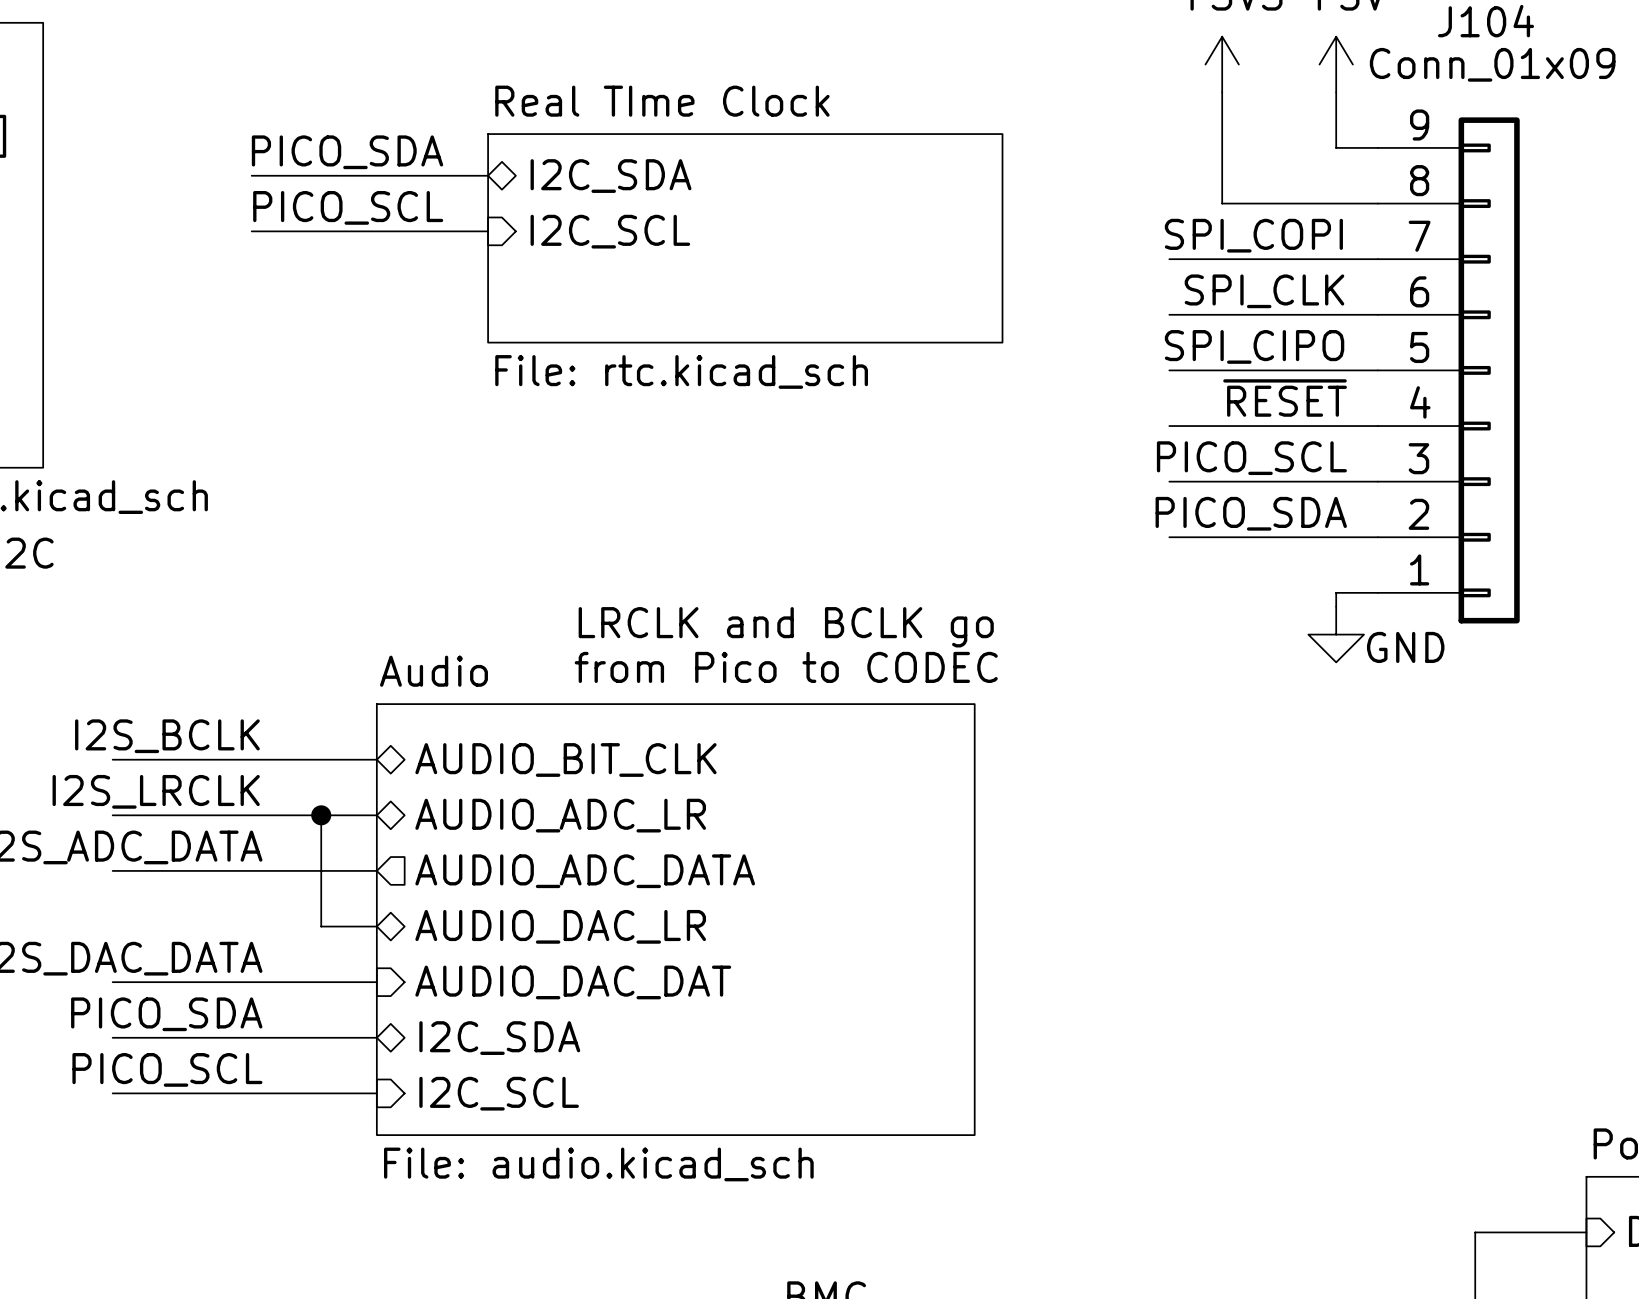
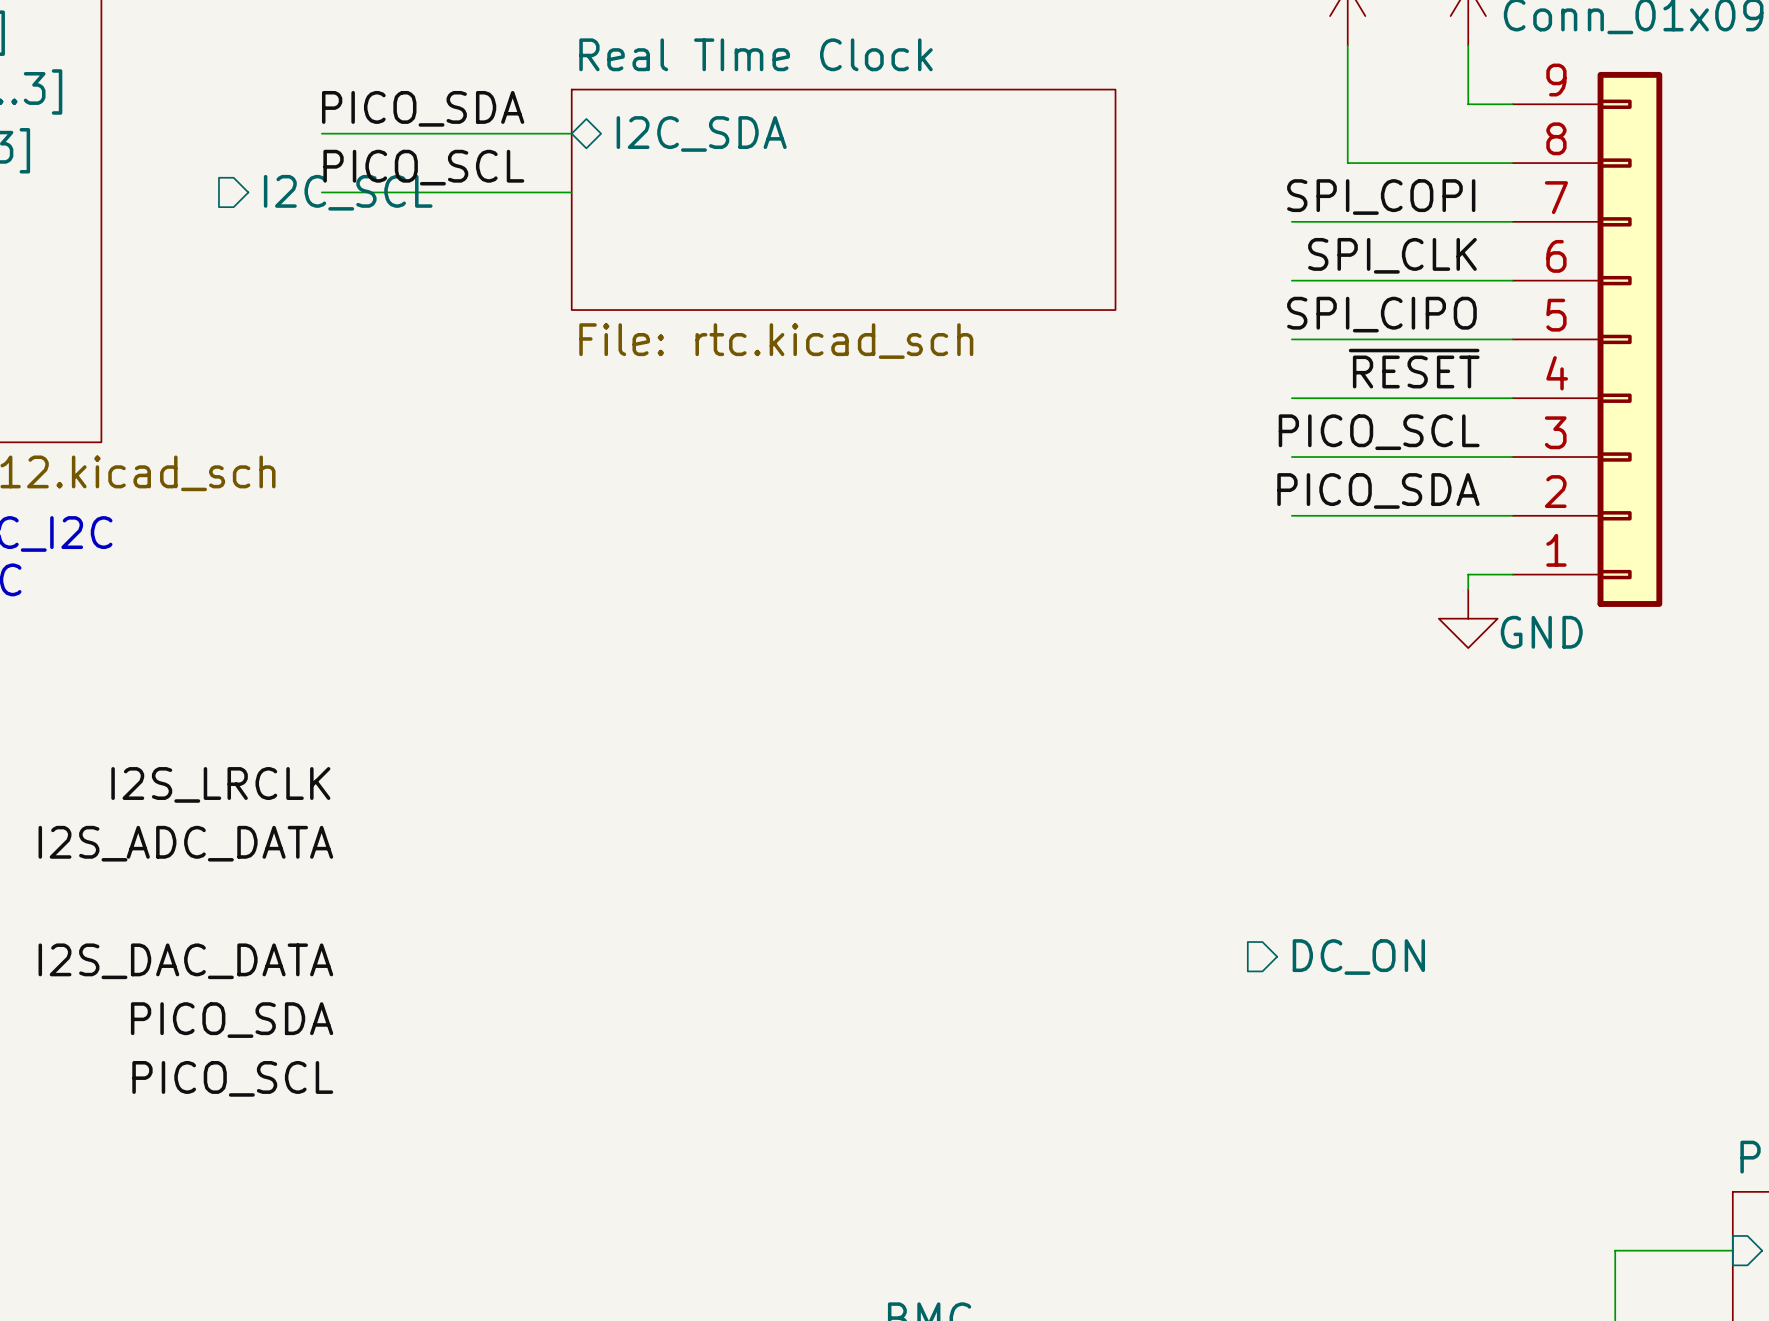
sheet pin position: I2C_SCL (610, 231) -> I2C_SCL (348, 192)
text: LRCLK and BCLK go (786, 627) -> none
text: from Pico to CODEC (786, 667) -> none
label: I2S_BCLK (167, 736) -> none
wire: (112, 759) (376, 759) -> none
sheet pin: AUDIO_BIT_CLK (565, 759) -> none
wire: (112, 815) (376, 815) -> none
wire: (321, 815) (321, 926) (376, 926) -> none
junction: (321, 815) -> none
sheet pin: AUDIO_ADC_LR (560, 815) -> none
wire: (112, 870) (376, 870) -> none
sheet pin: AUDIO_ADC_DATA (585, 871) -> none
sheet Audio: File: audio.kicad_sch (675, 919) -> none
sheet pin: AUDIO_DAC_LR (560, 926) -> none
sheet pin: none -> DC_ON (1358, 957)
wire: (112, 982) (376, 982) -> none
sheet pin: AUDIO_DAC_DAT (573, 982) -> none
wire: (112, 1037) (376, 1037) -> none
sheet pin: I2C_SDA (499, 1038) -> none
wire: (112, 1093) (376, 1093) -> none
sheet pin: I2C_SCL (499, 1093) -> none

